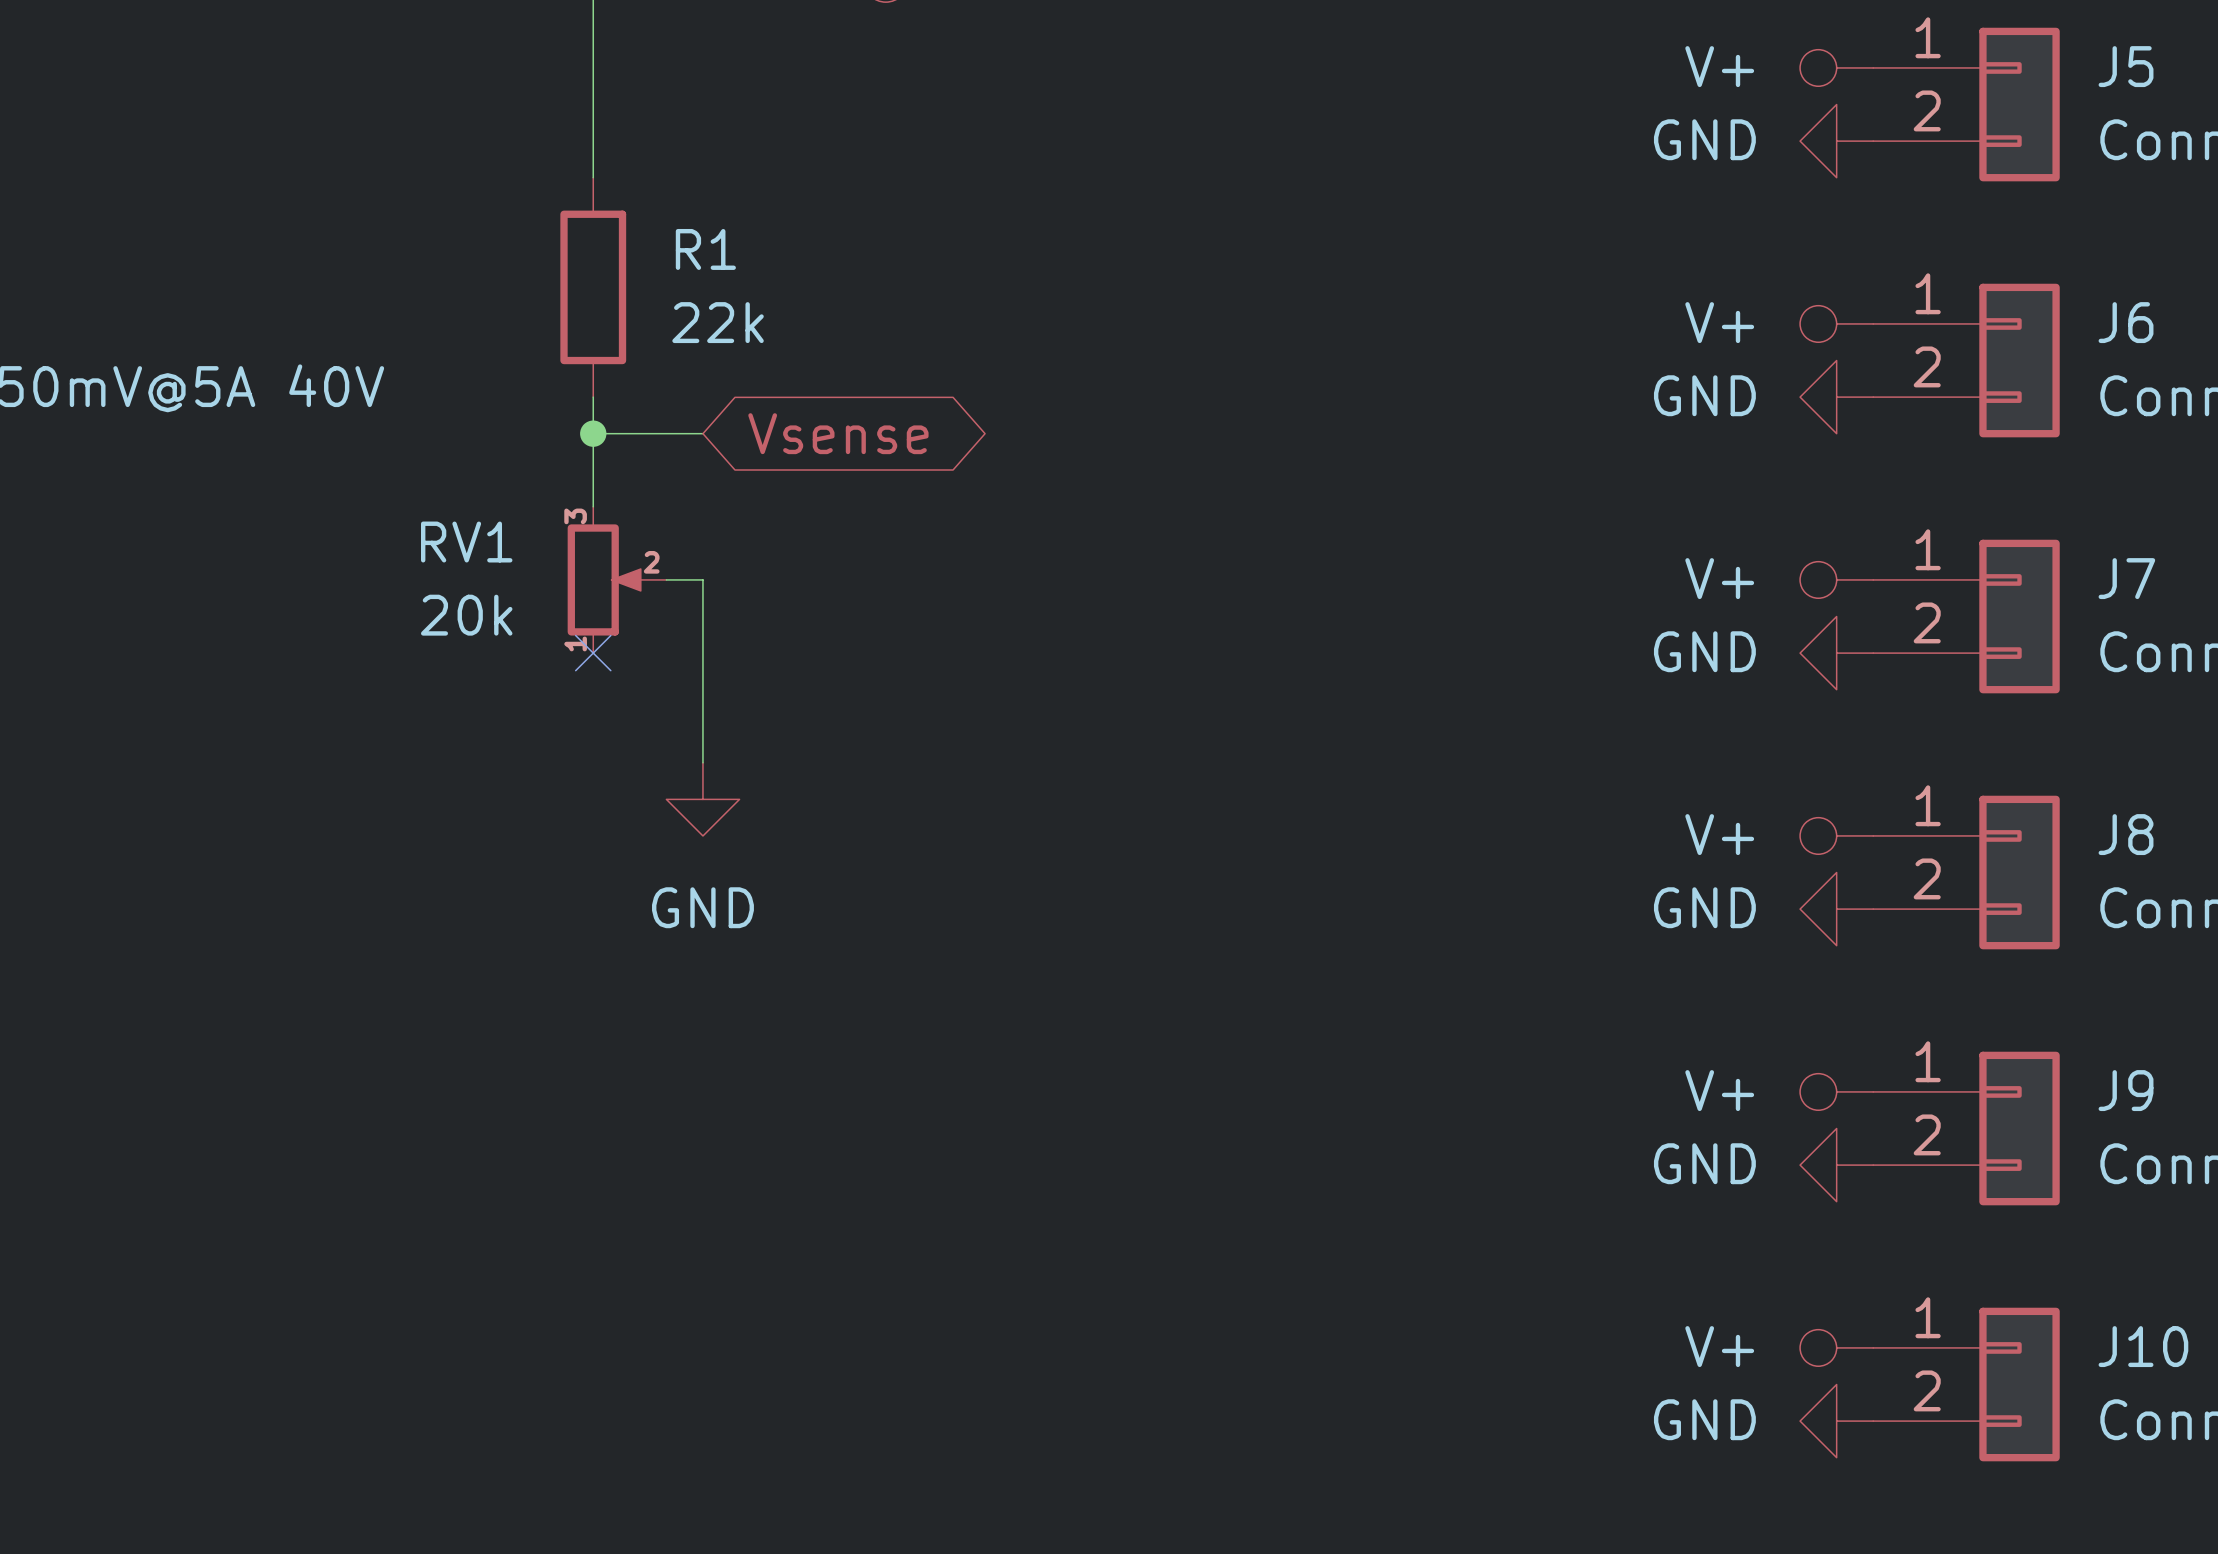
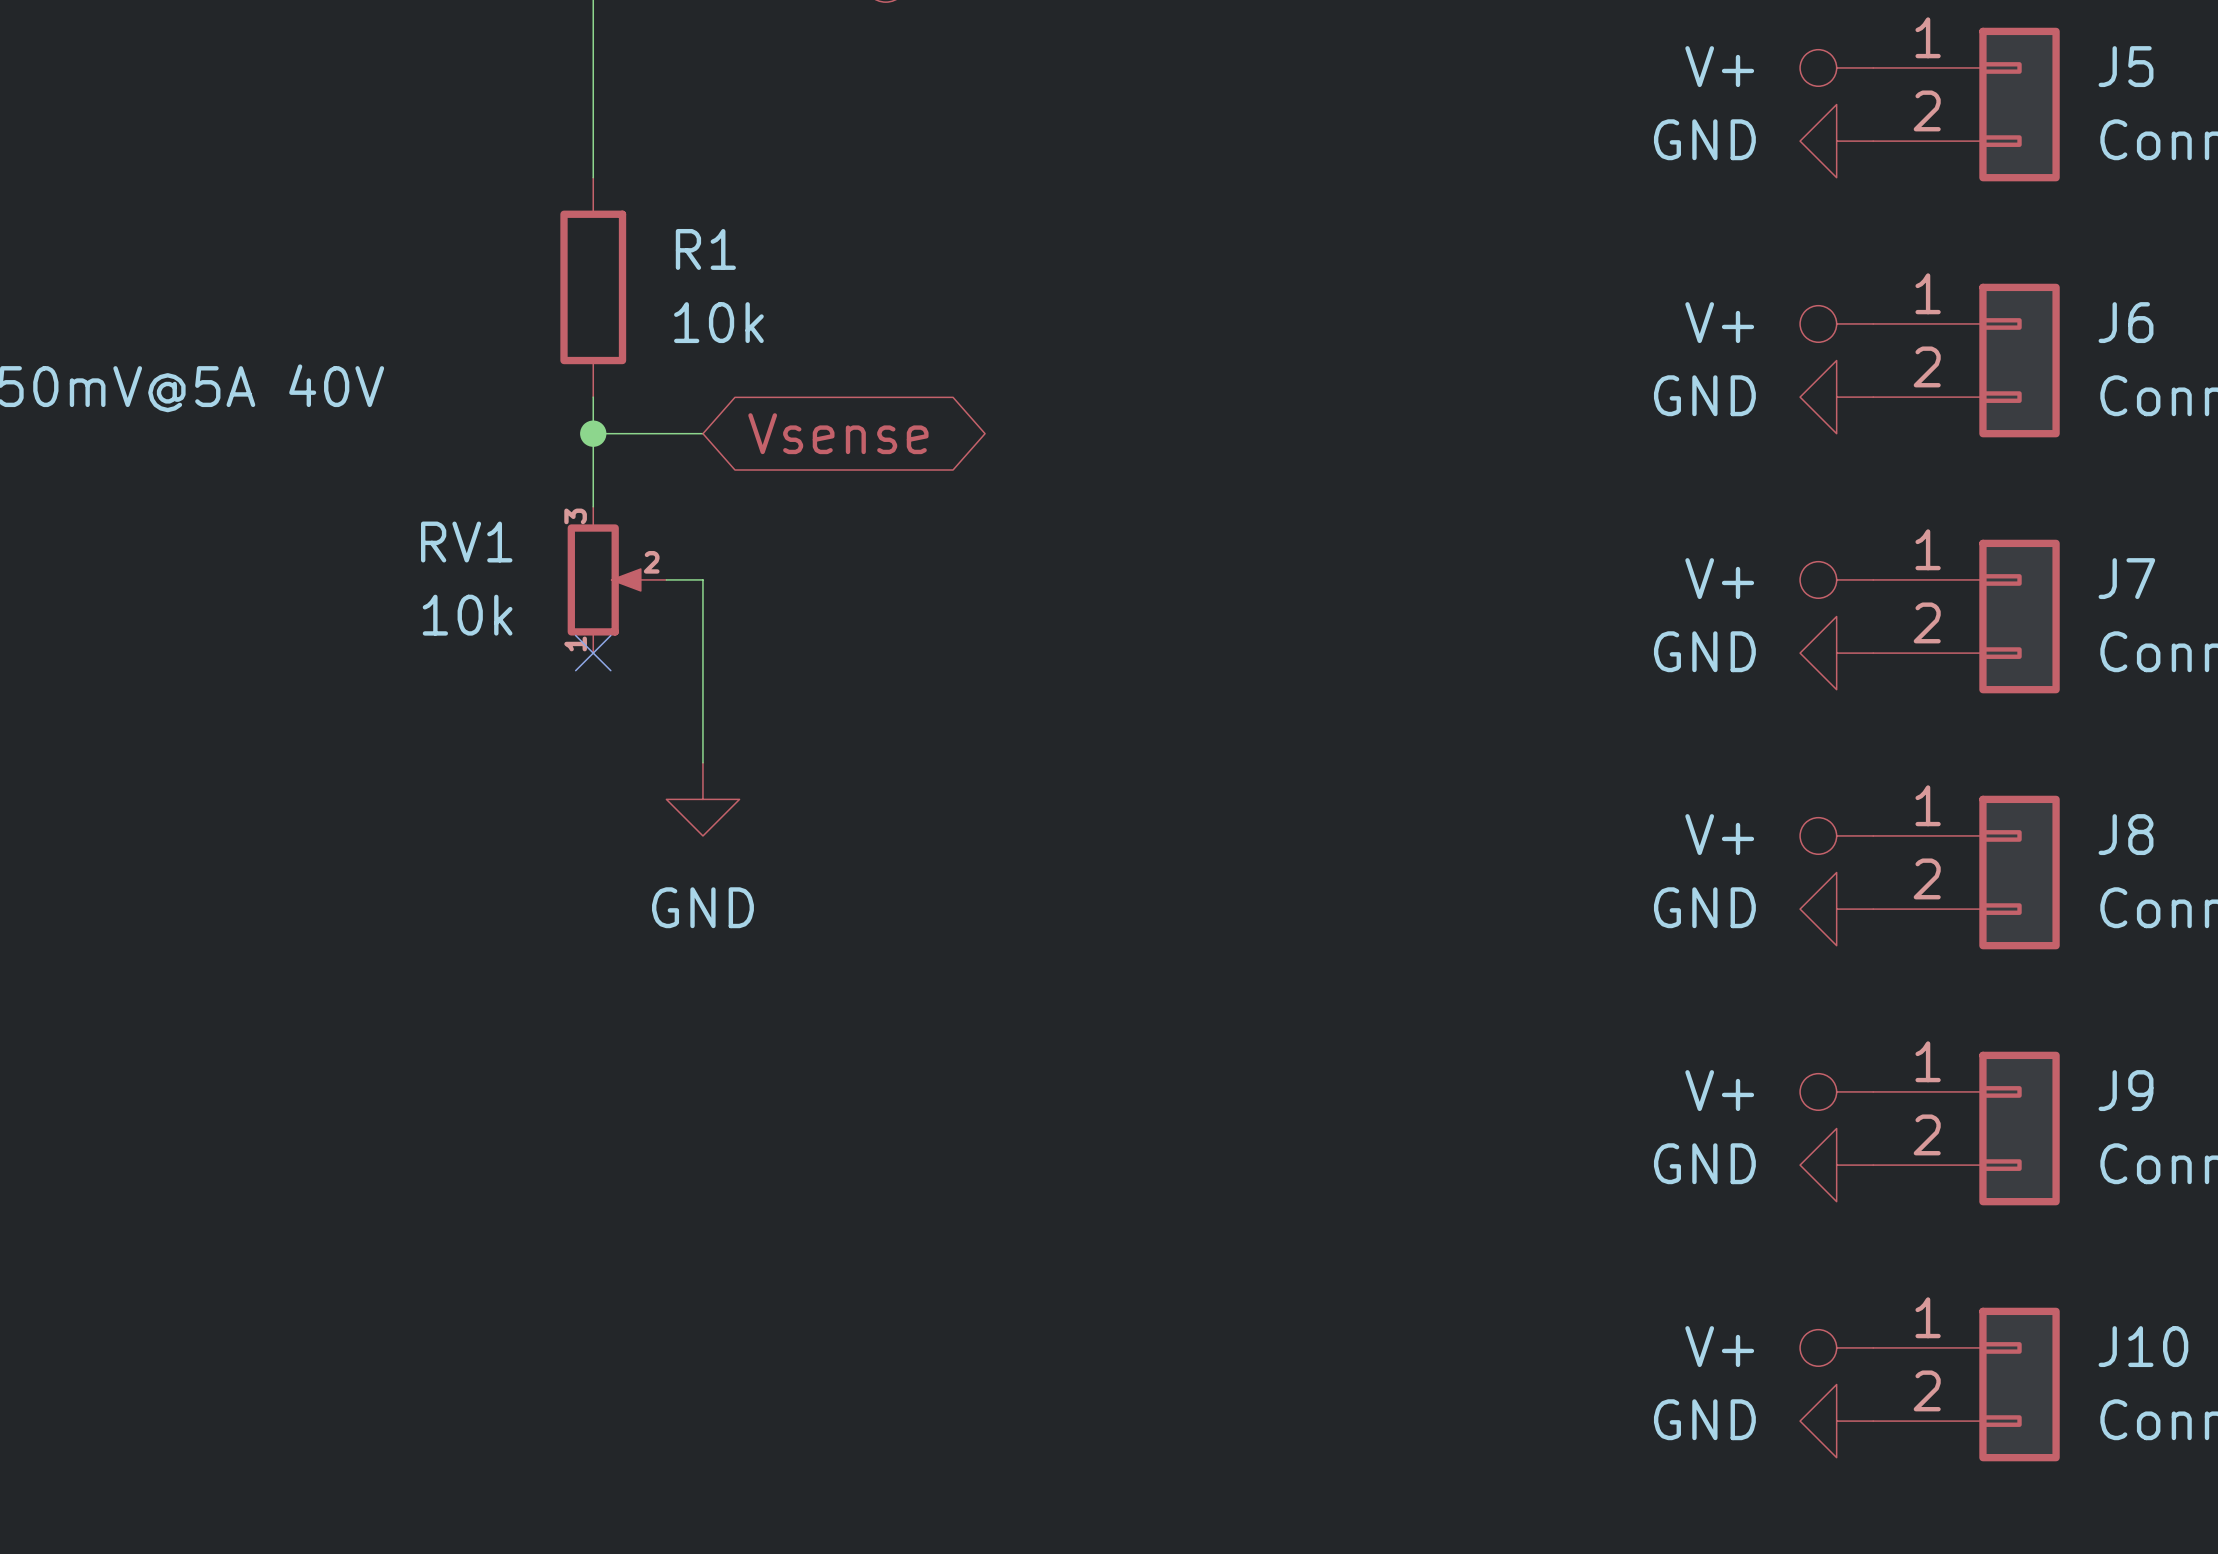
R1 value: 22k (718, 322) -> 10k (718, 322)
RV1 value: 20k (466, 615) -> 10k (467, 615)

